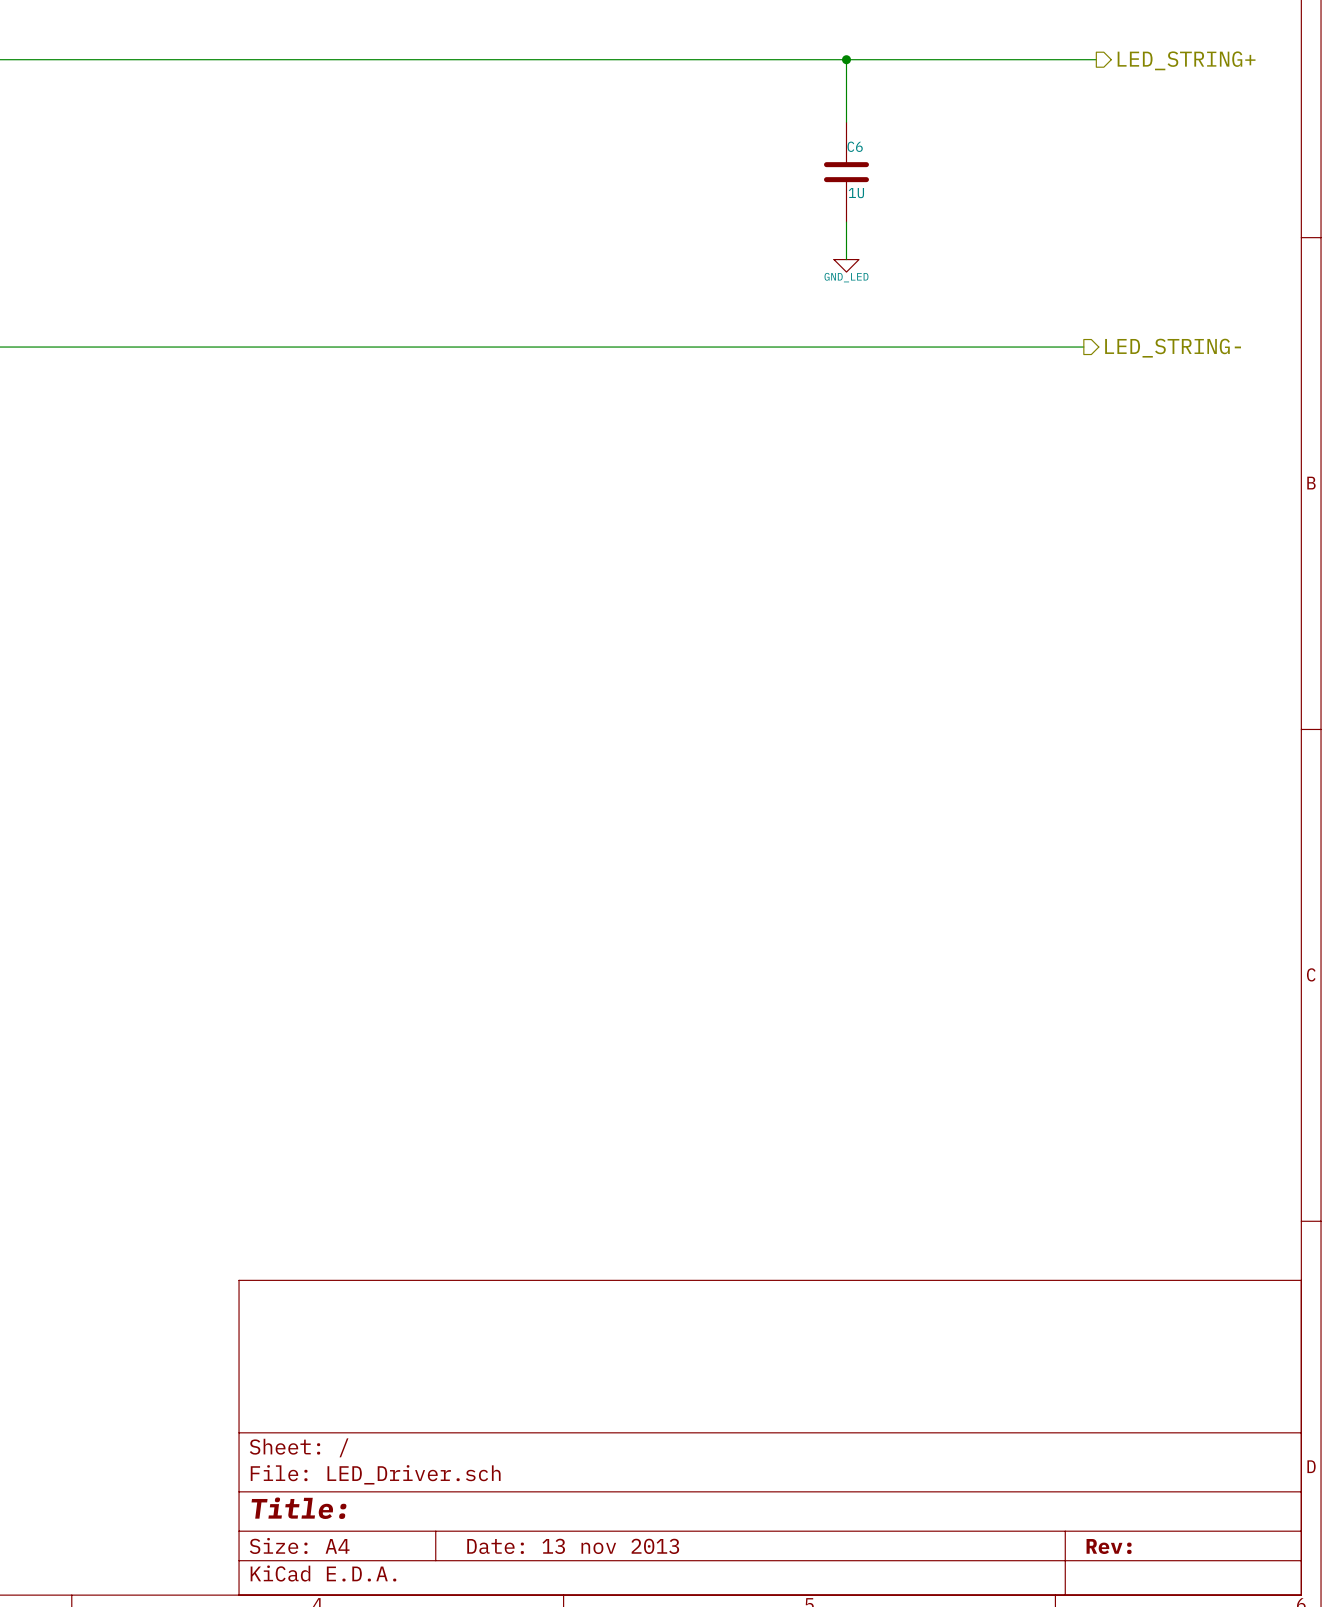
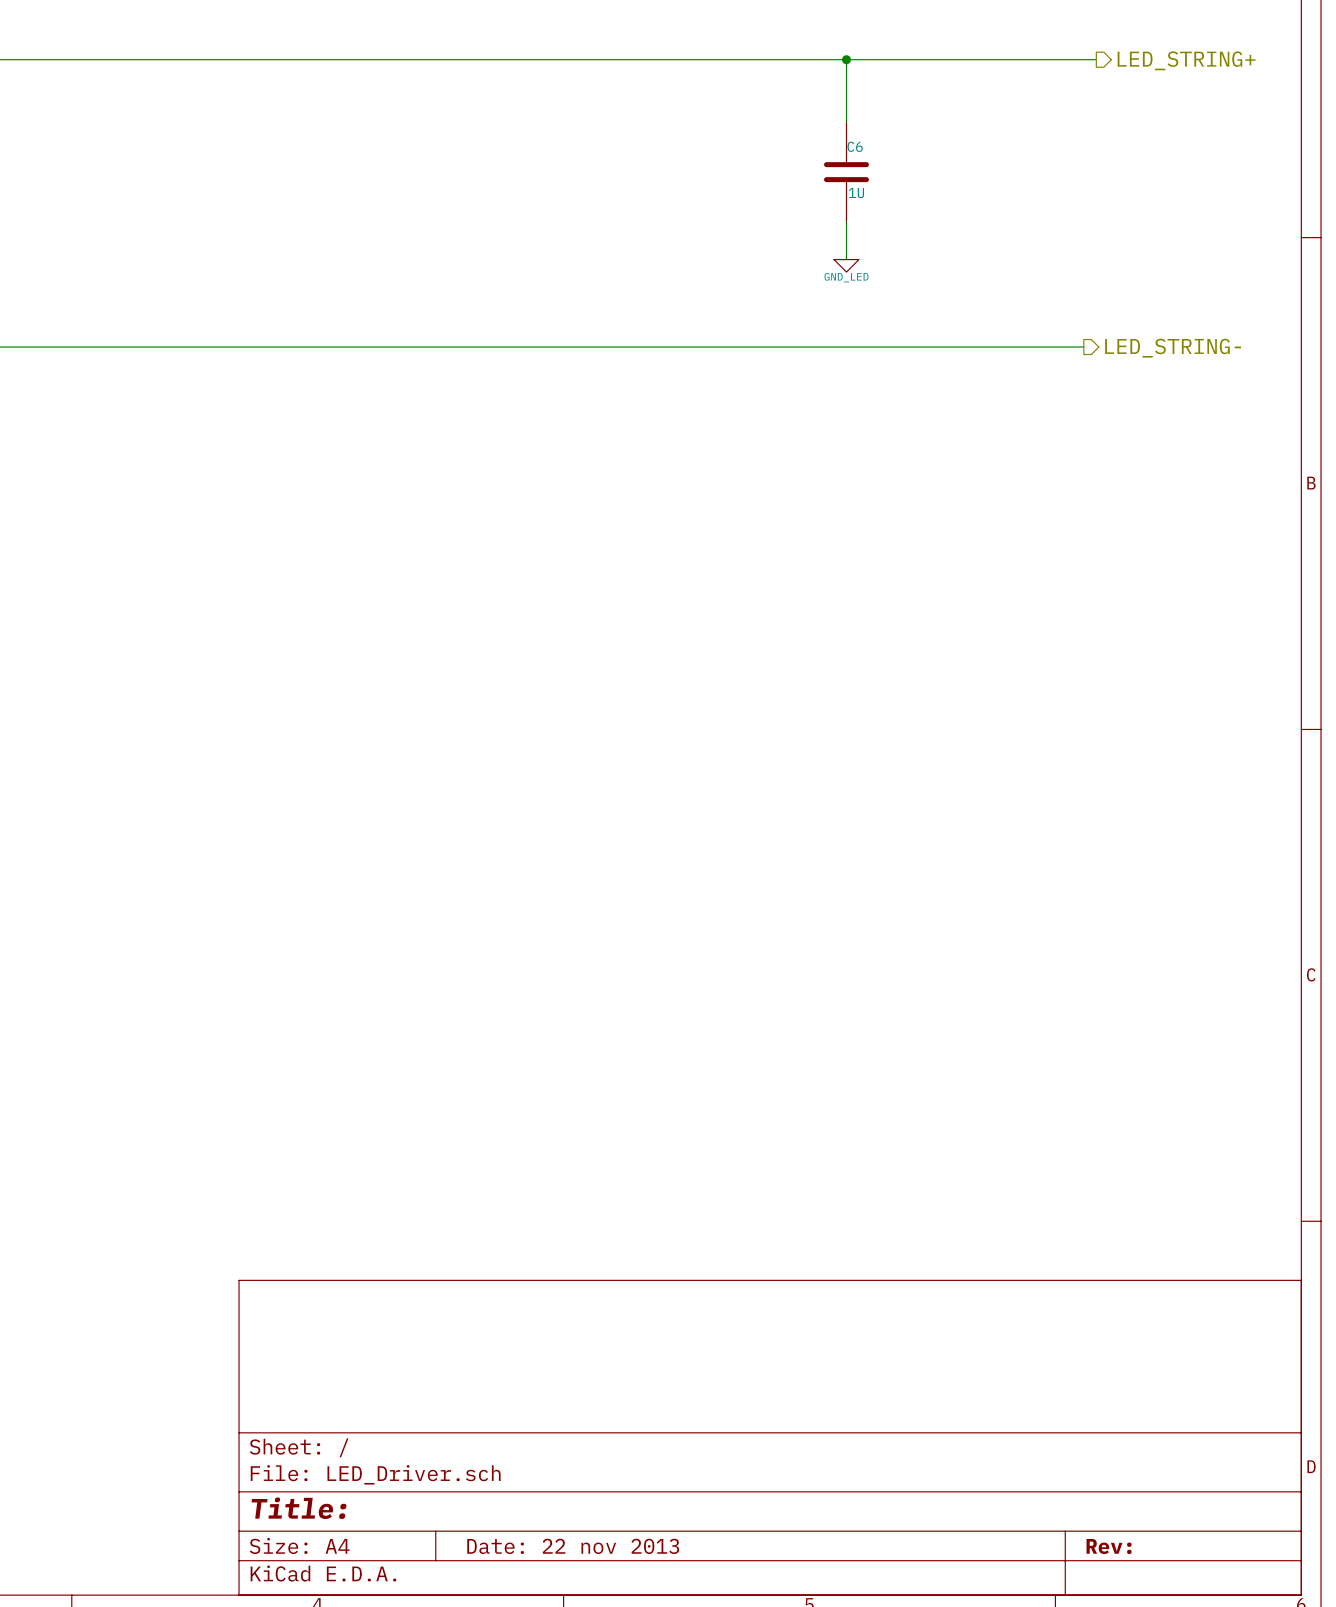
title block: Date: 13 nov 2013 (573, 1546) -> Date: 22 nov 2013 (573, 1546)

